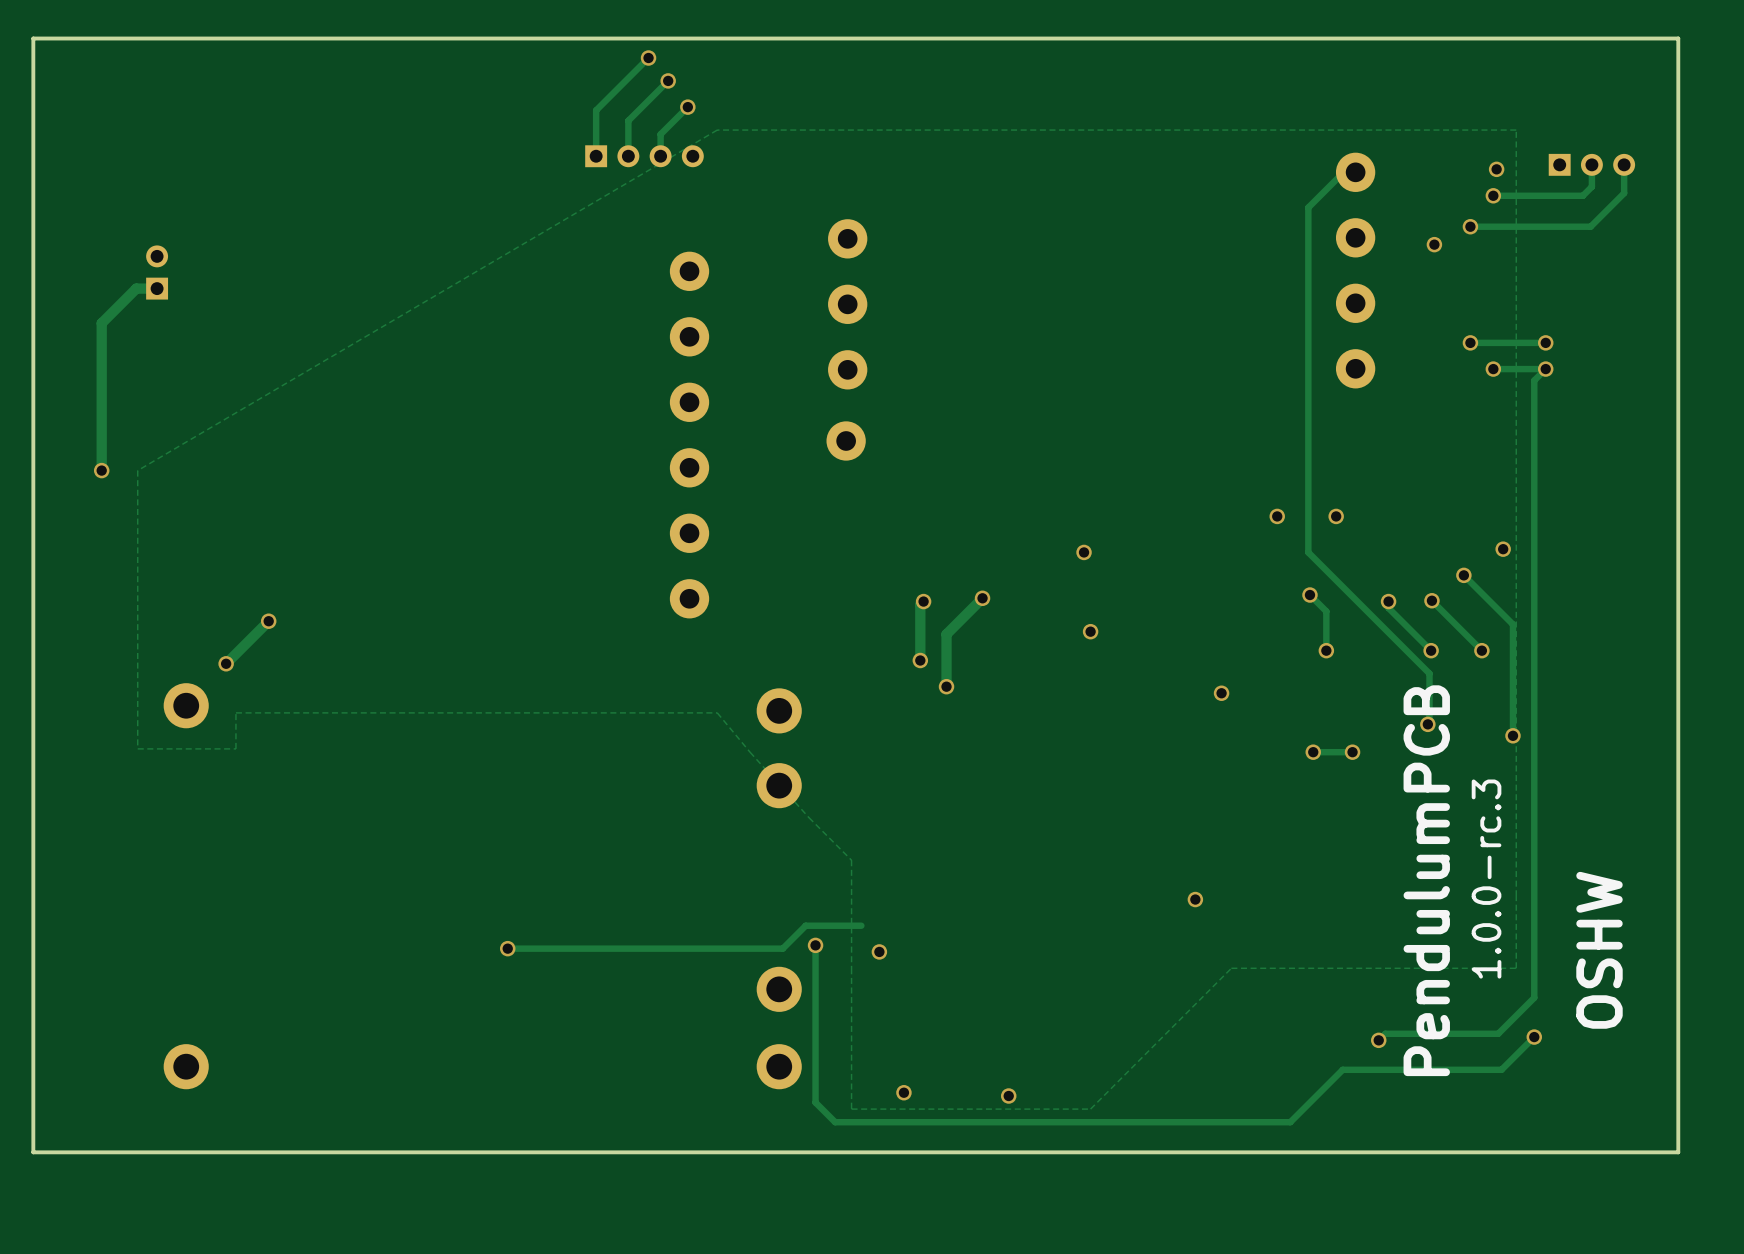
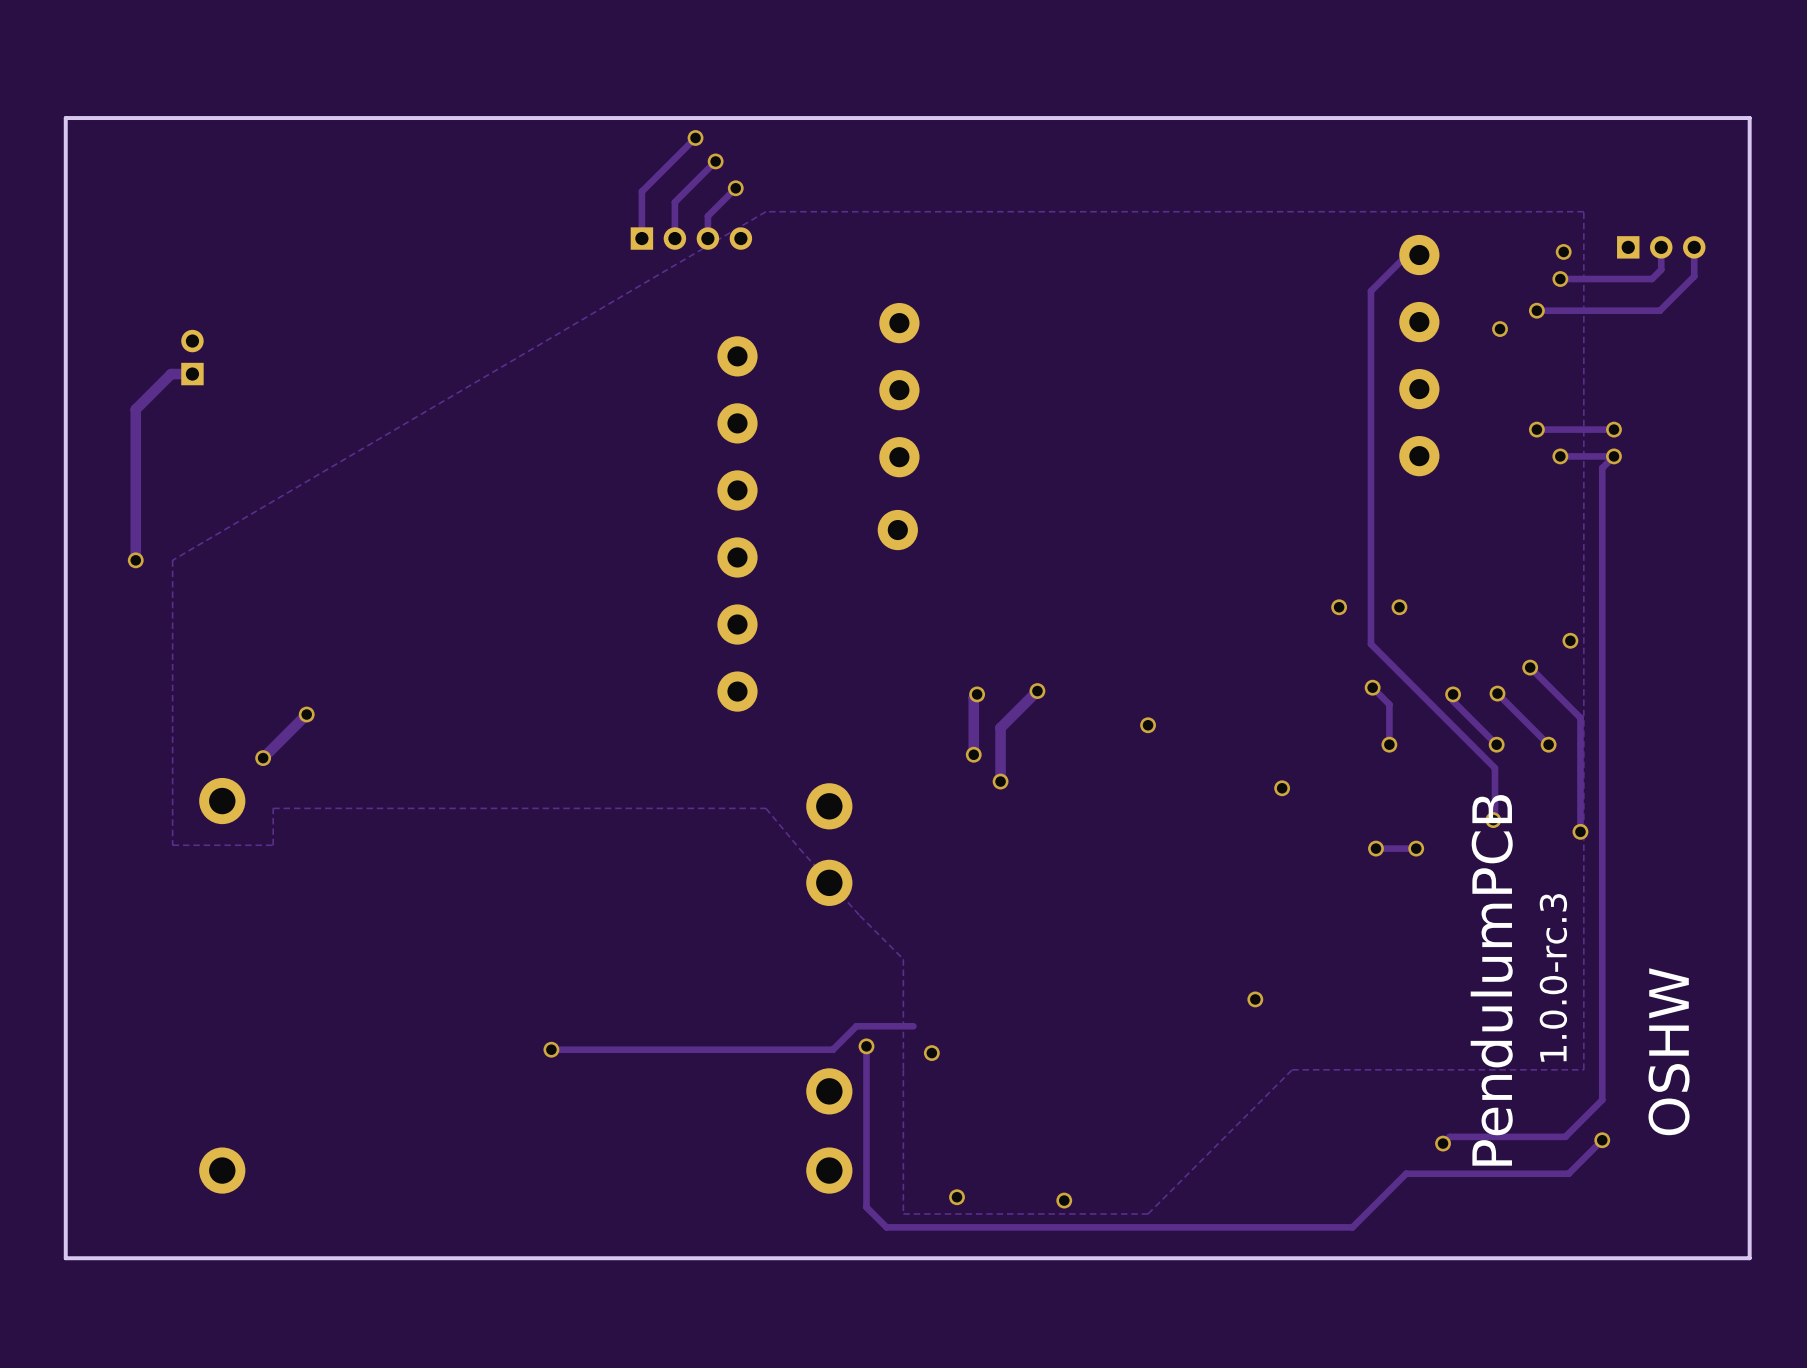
via: (1084, 552) -> none

